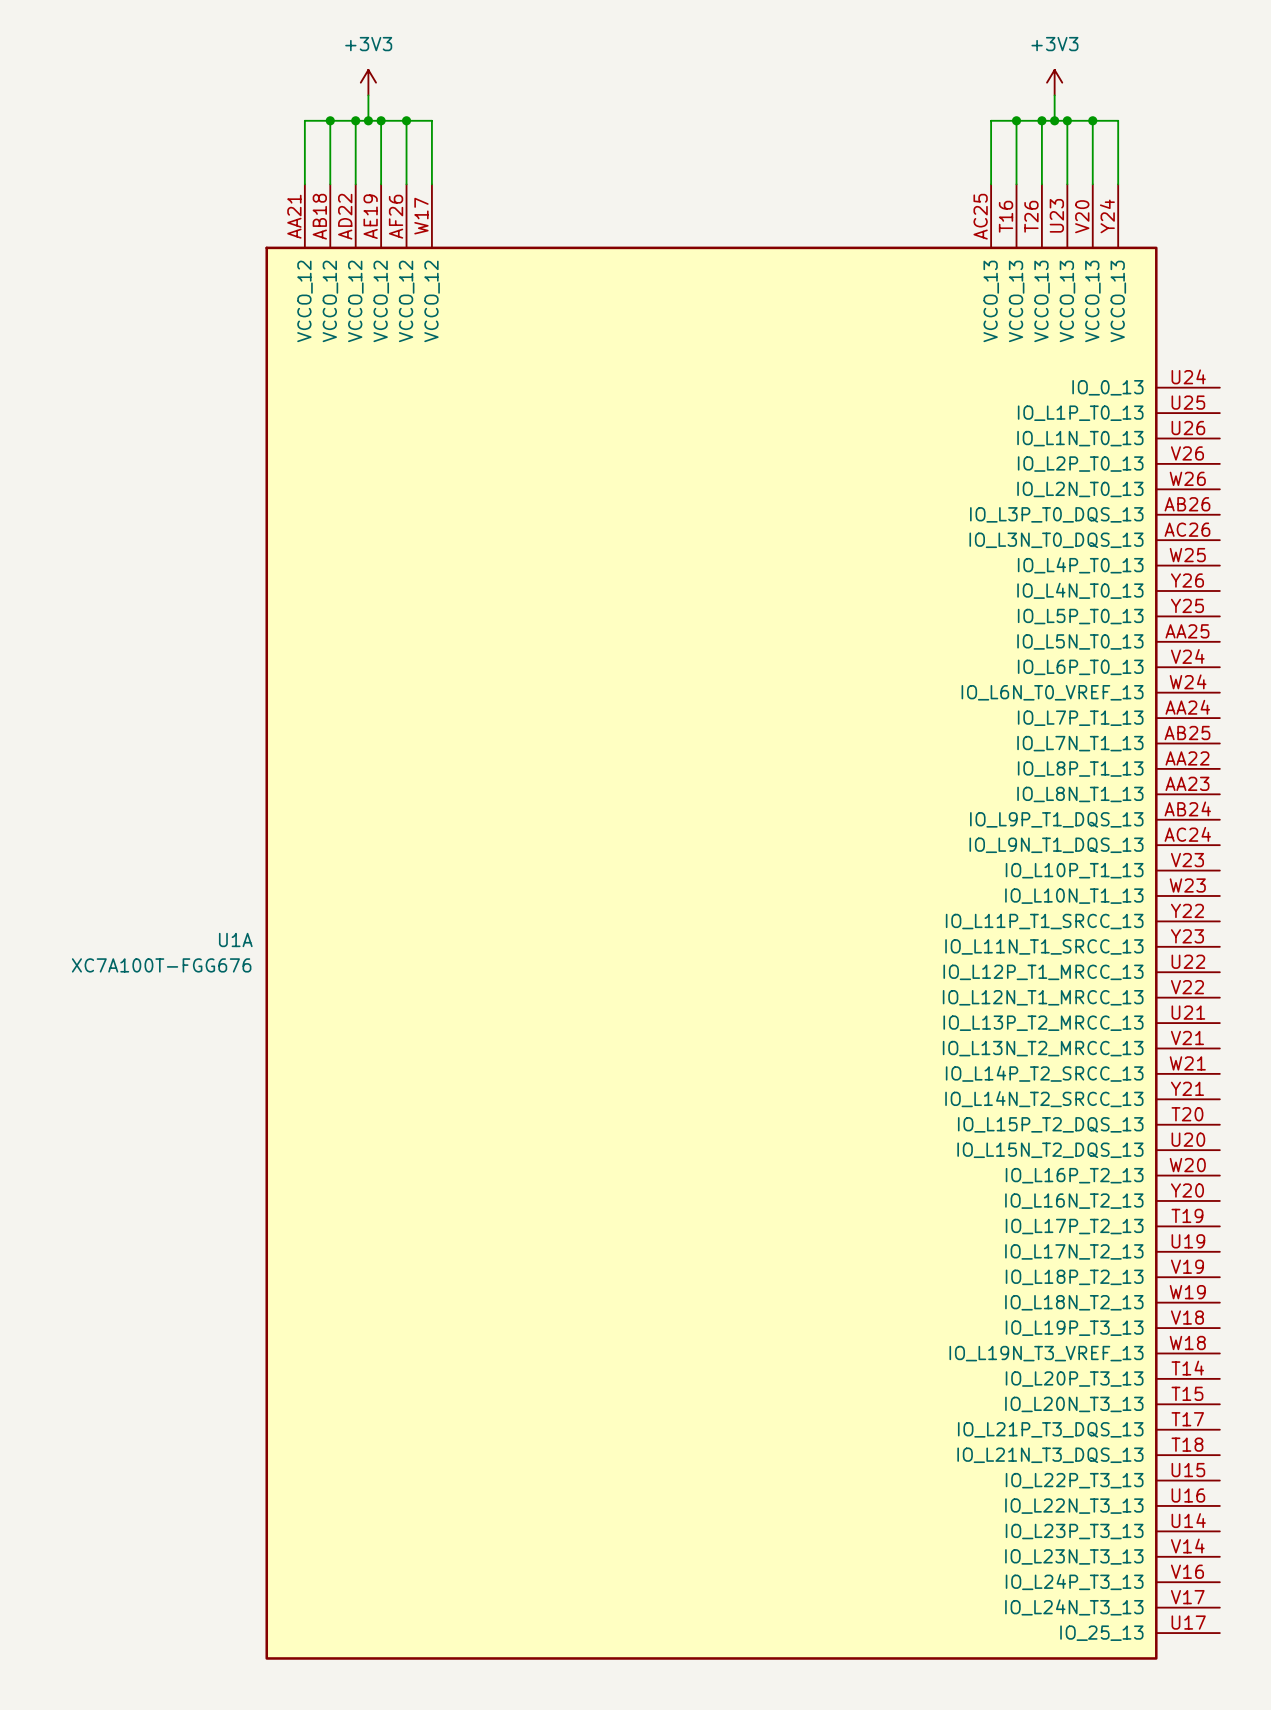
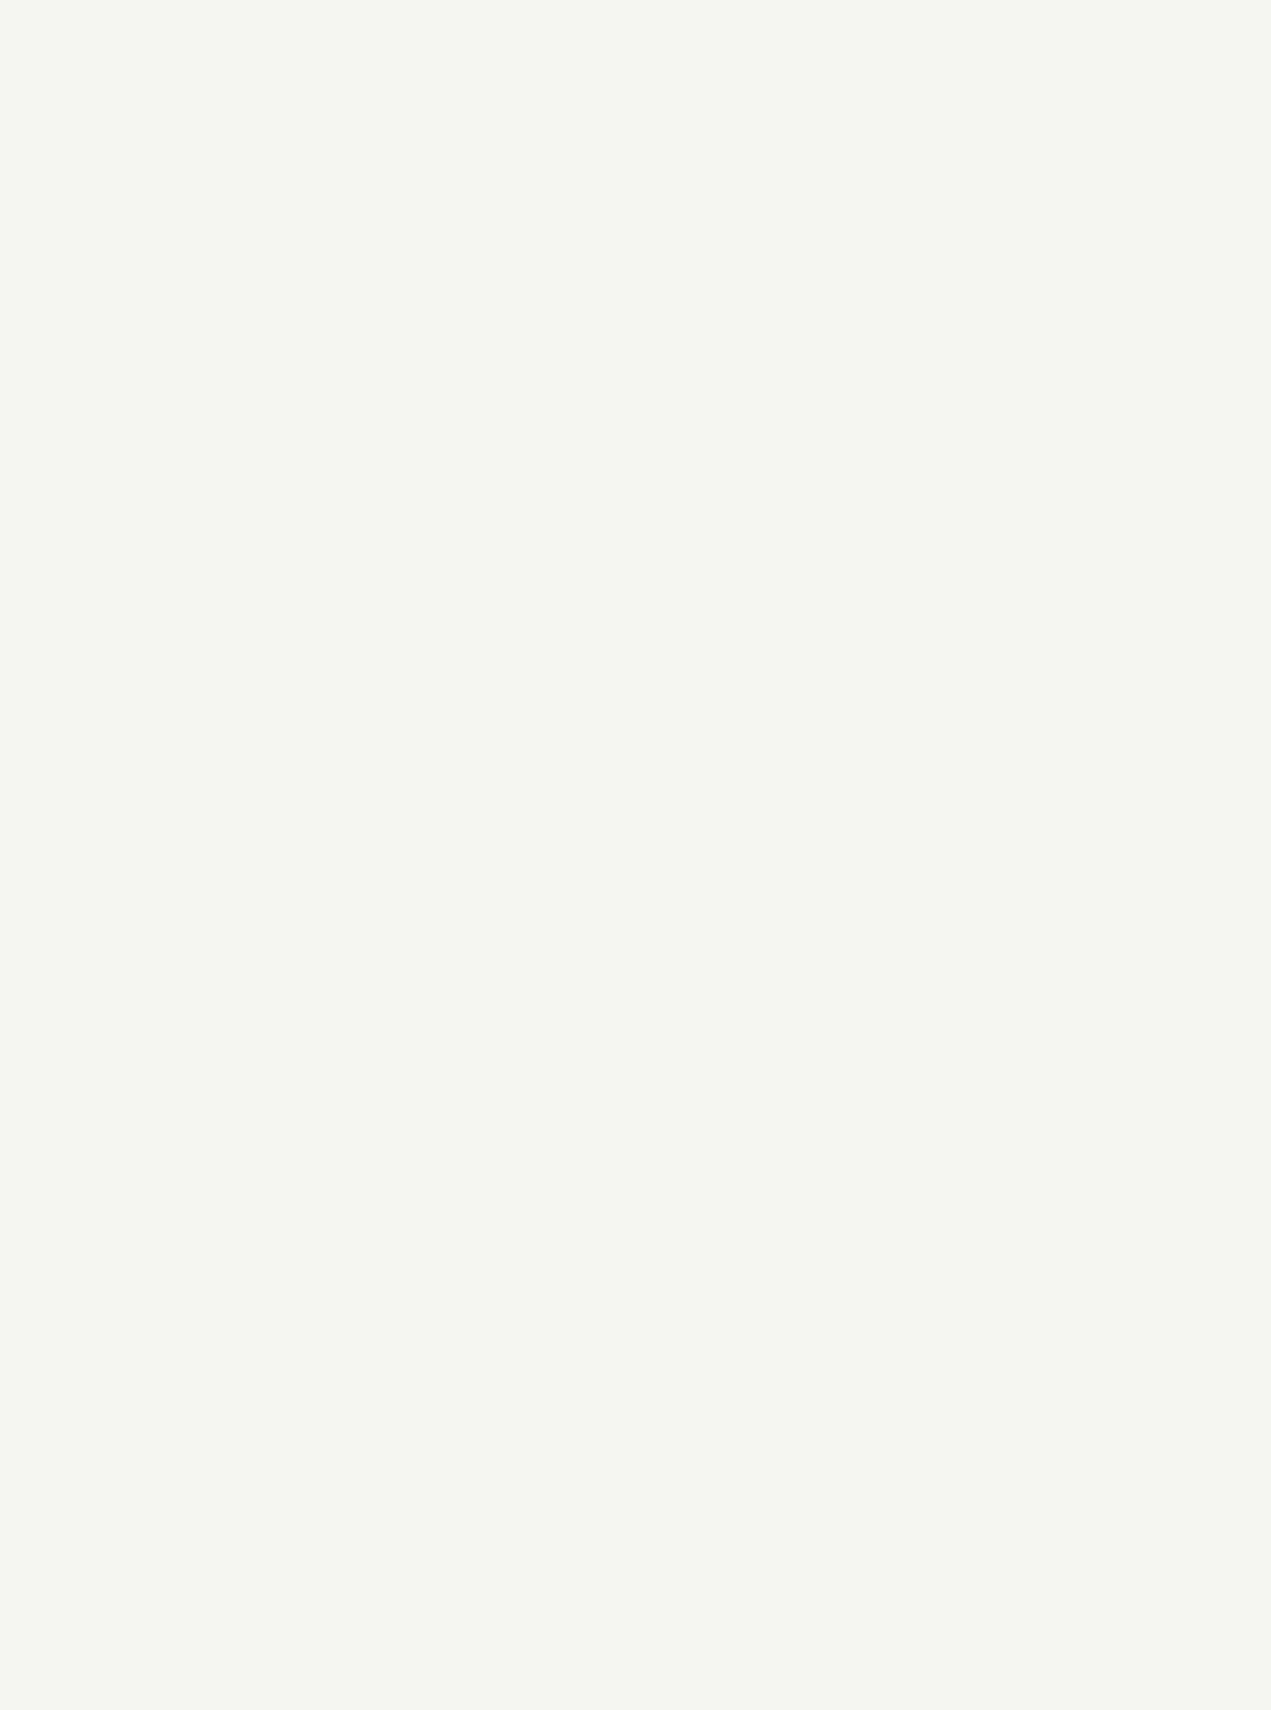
power symbol: +3V3 (368, 82) -> none
power symbol: +3V3 (1054, 82) -> none
wire: (368, 95) (368, 120) -> none
wire: (1054, 95) (1054, 120) -> none
wire: (330, 120) (330, 184) -> none
junction: (330, 120) -> none
wire: (355, 120) (355, 184) -> none
junction: (355, 120) -> none
junction: (368, 120) -> none
wire: (381, 120) (381, 184) -> none
junction: (381, 120) -> none
wire: (406, 120) (406, 184) -> none
junction: (406, 120) -> none
wire: (1016, 120) (1016, 184) -> none
junction: (1016, 120) -> none
wire: (1041, 120) (1041, 184) -> none
junction: (1041, 120) -> none
junction: (1054, 120) -> none
wire: (1067, 120) (1067, 184) -> none
junction: (1067, 120) -> none
wire: (1092, 120) (1092, 184) -> none
junction: (1092, 120) -> none
wire: (304, 184) (304, 120) (431, 120) (431, 184) -> none
wire: (991, 184) (991, 120) (1118, 120) (1118, 184) -> none
U1A: XC7A100T-FGG676 (742, 922) -> none

